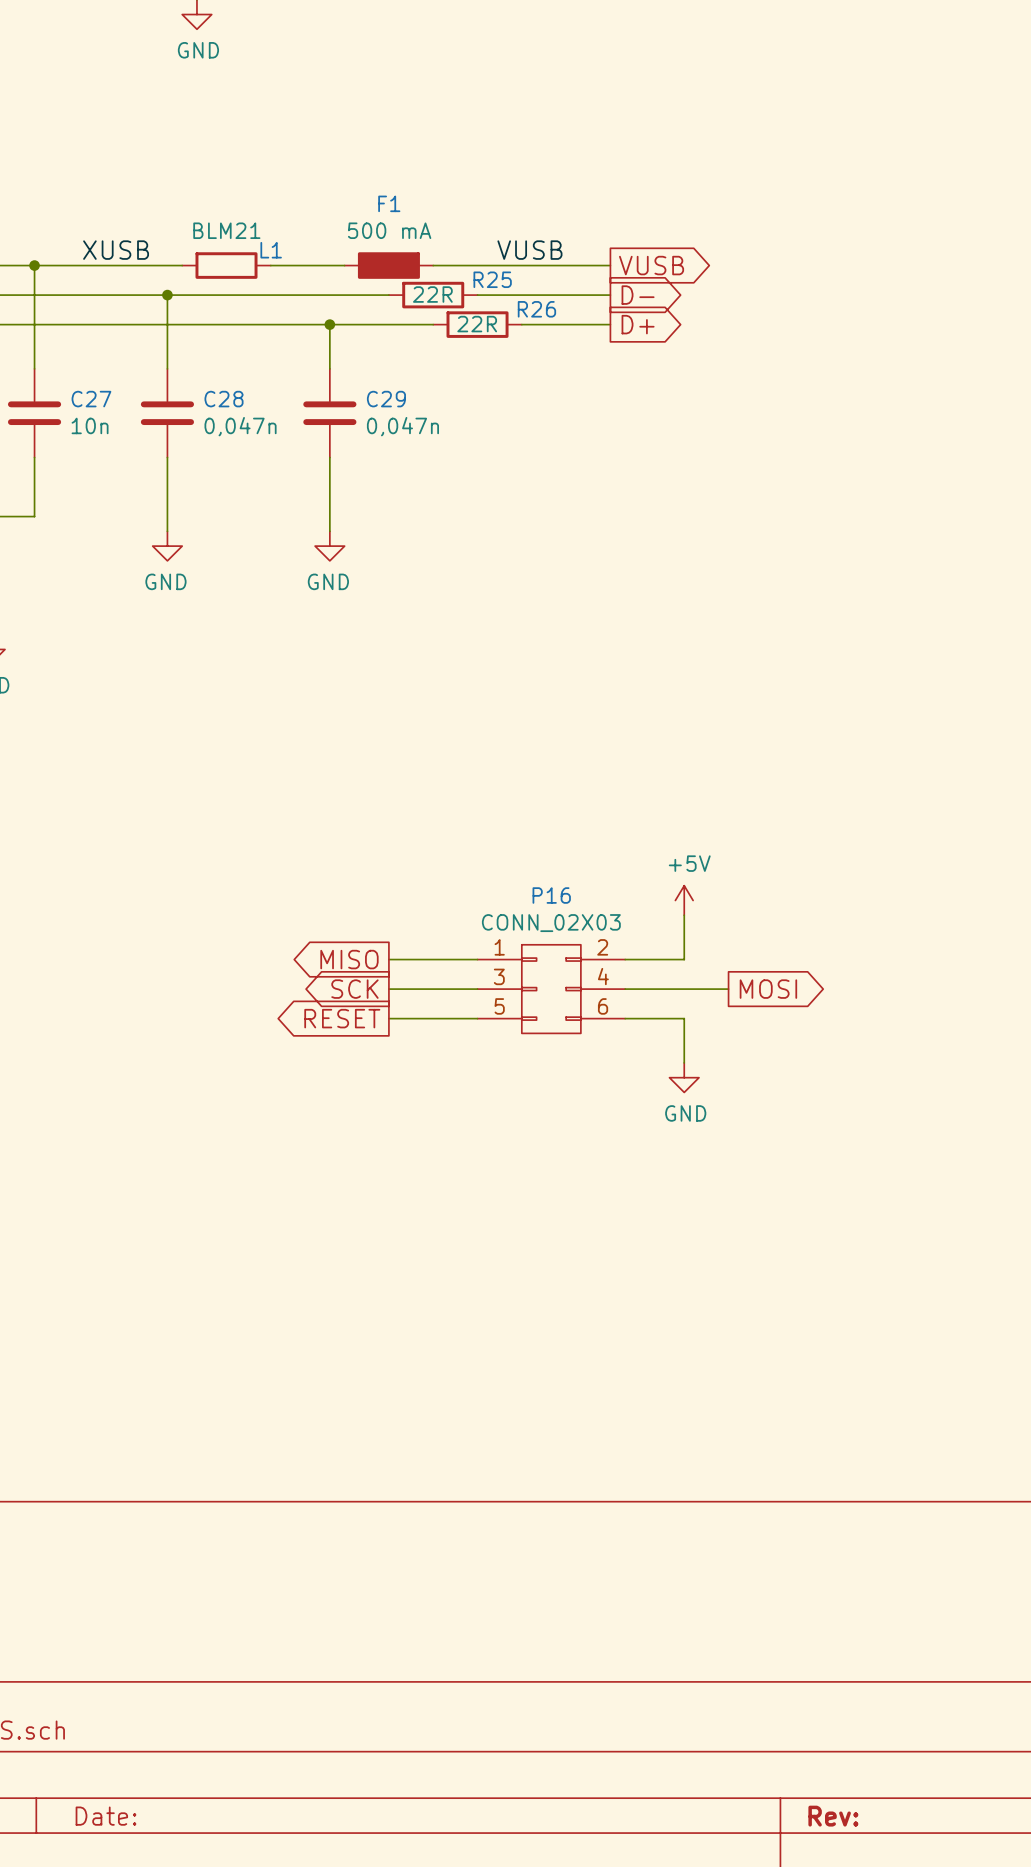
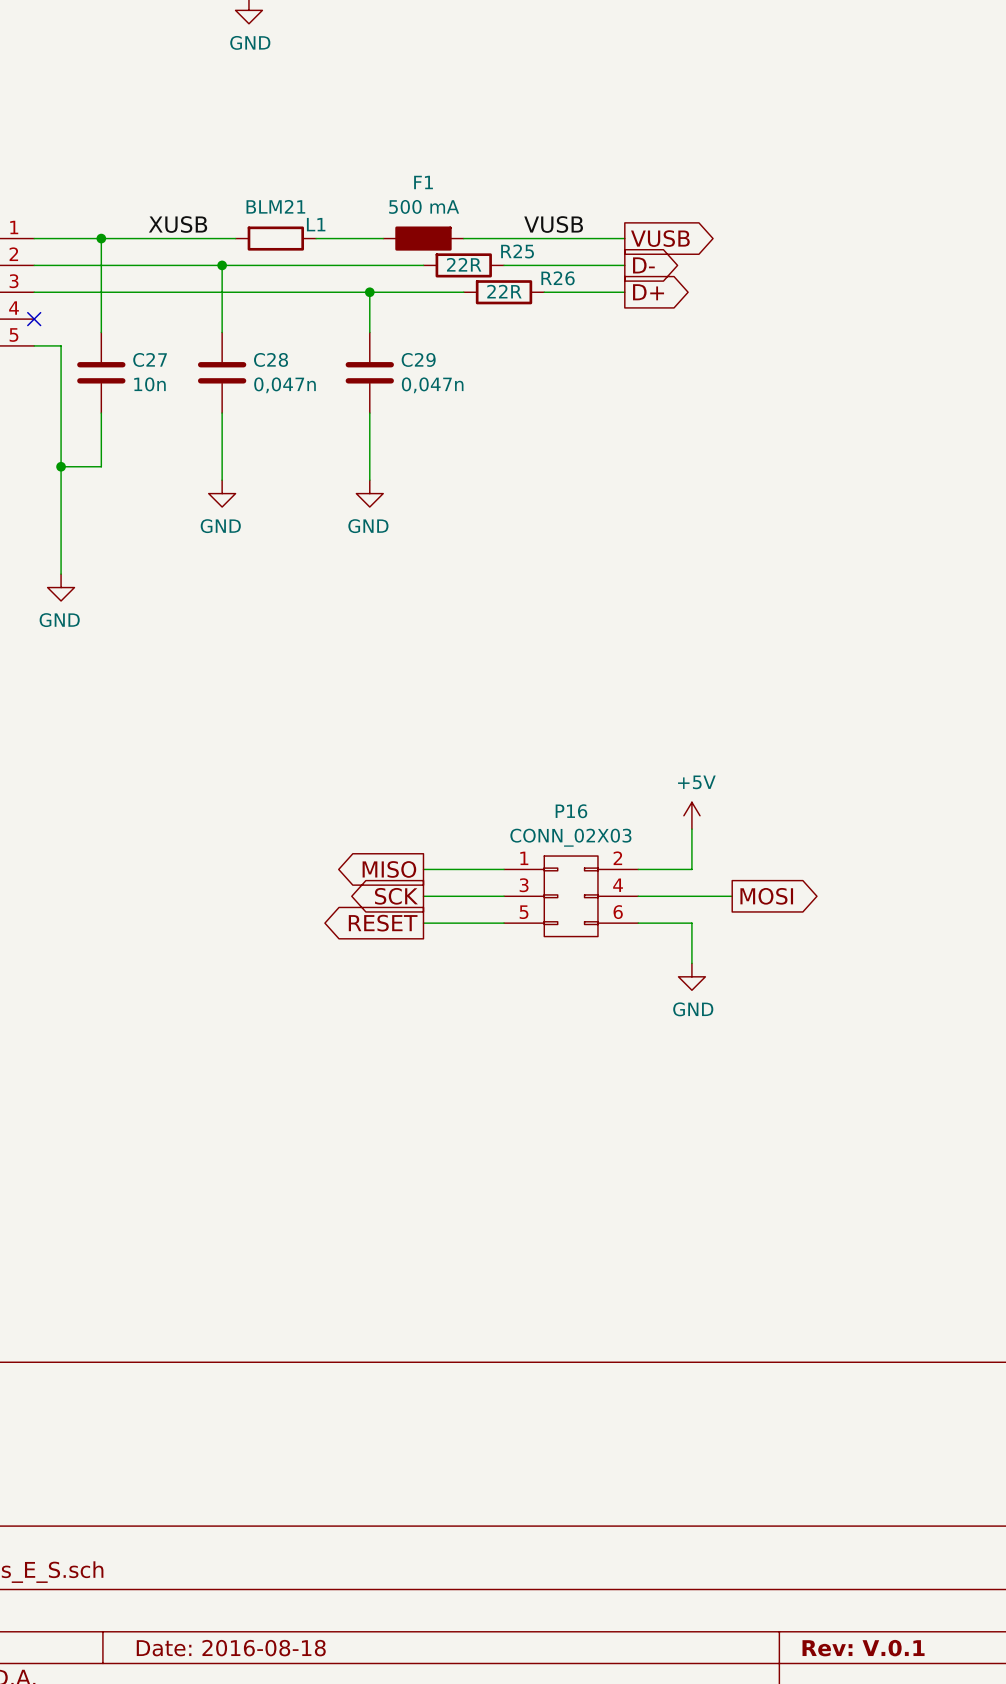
title block: Date: (105, 1816) -> Date: 2016-08-18 (231, 1648)
title block: Rev: (833, 1816) -> Rev: V.0.1 (863, 1648)

